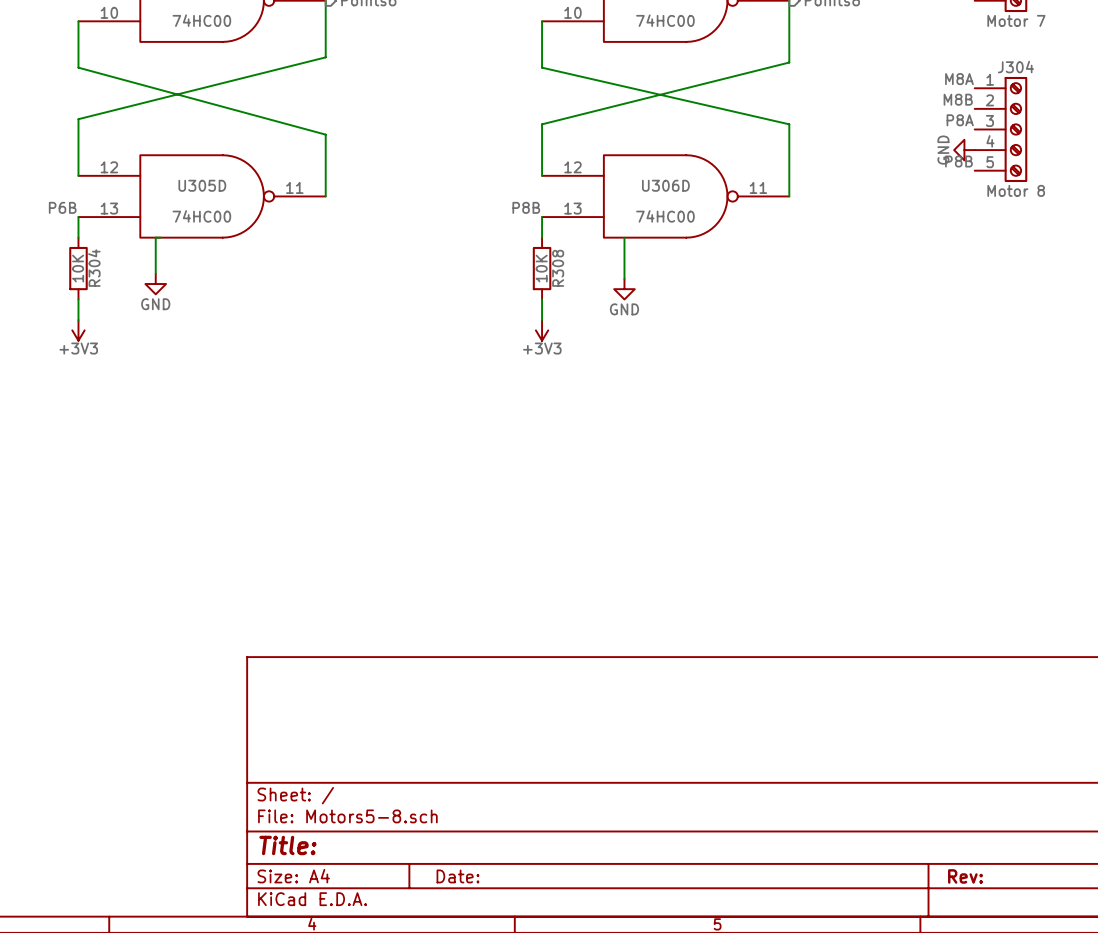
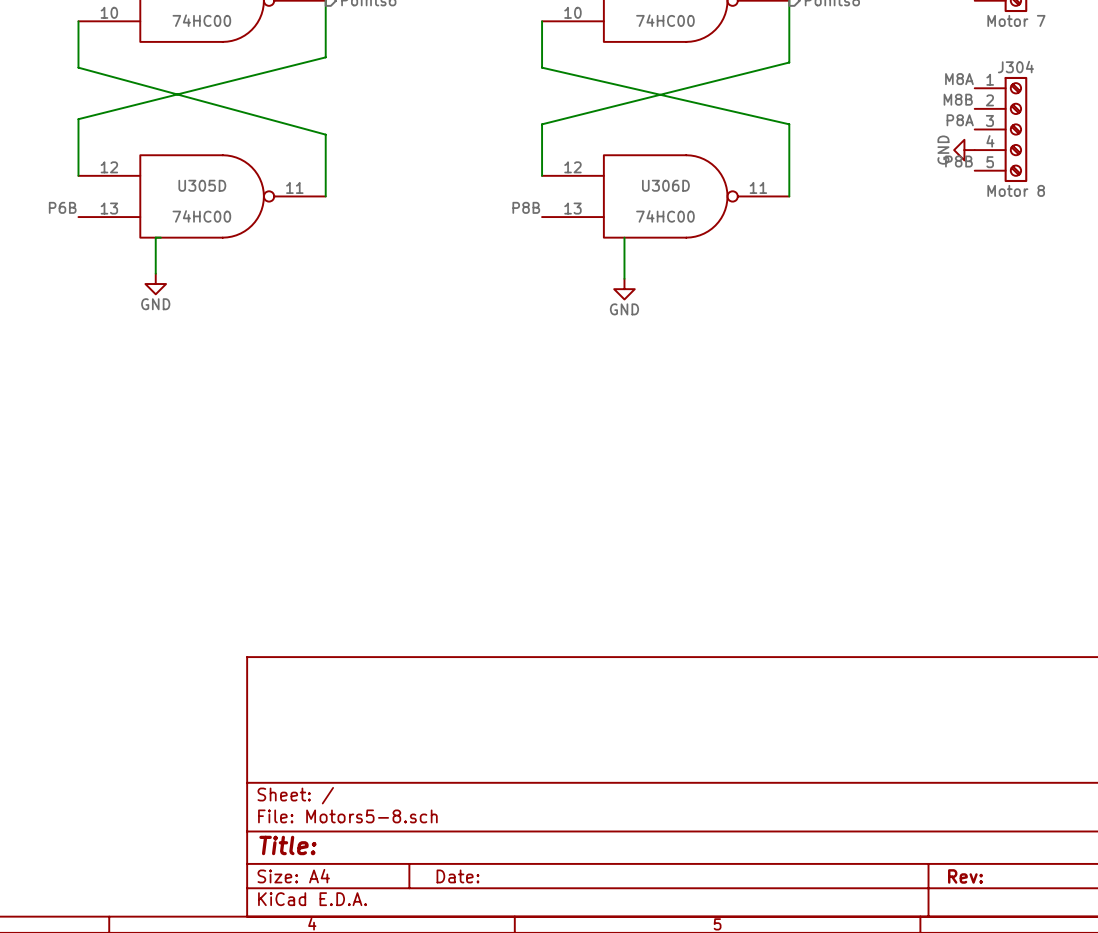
wire: (78, 217) (78, 237) -> none
wire: (542, 217) (542, 237) -> none
R304: 10K (78, 268) -> none
R308: 10K (542, 268) -> none
wire: (78, 299) (78, 320) -> none
wire: (542, 299) (542, 320) -> none
power symbol: +3V3 (78, 330) -> none
power symbol: +3V3 (542, 330) -> none

